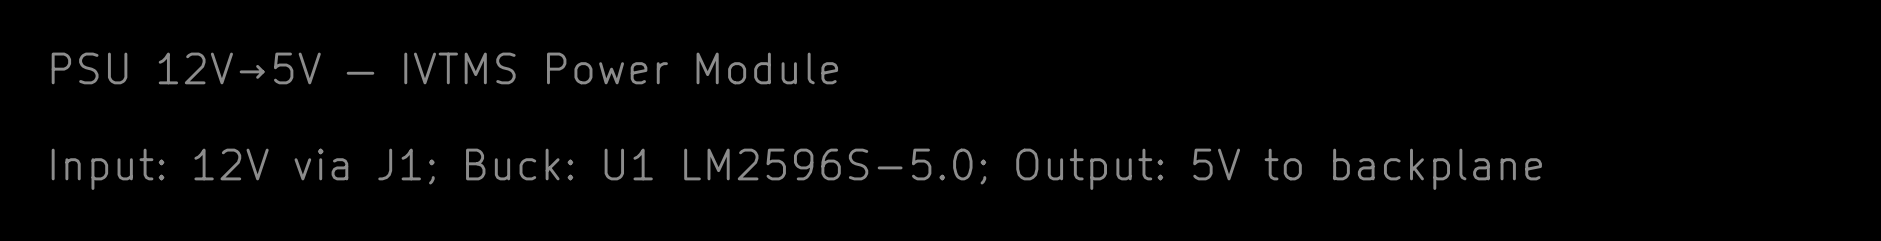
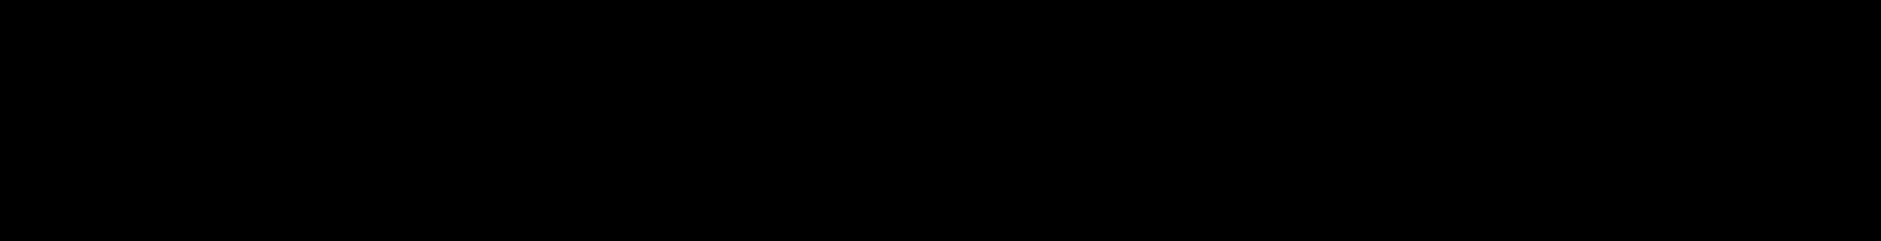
text: PSU 12V→5V — IVTMS Power Module (444, 68) -> none
text: Input: 12V via J1; Buck: U1 LM2596S-5.0; Output: 5V to backplane (796, 169) -> none

